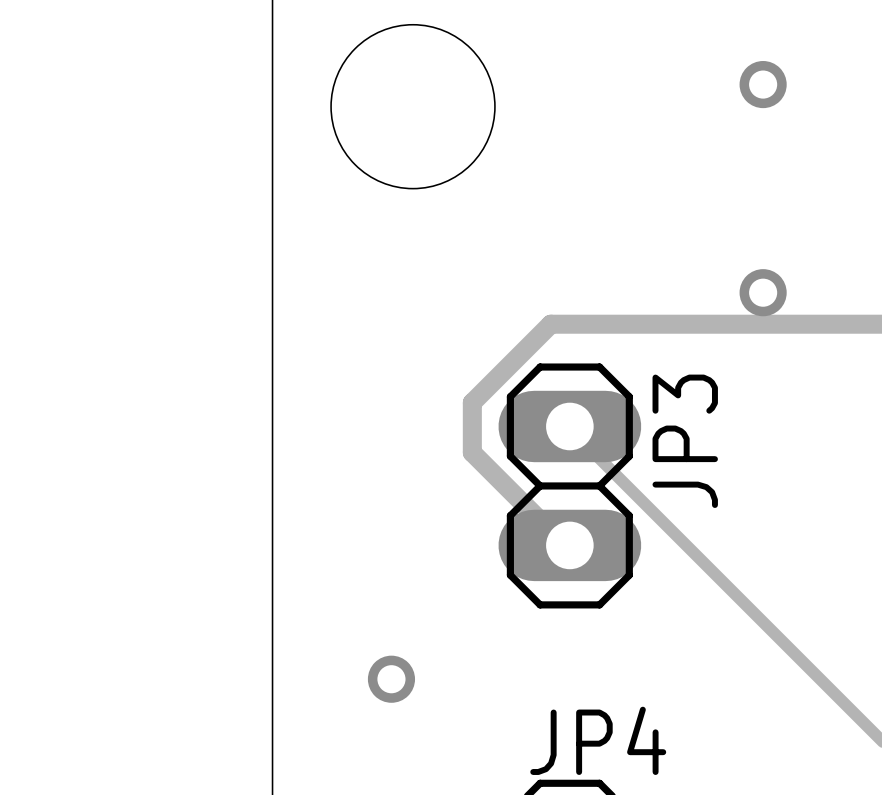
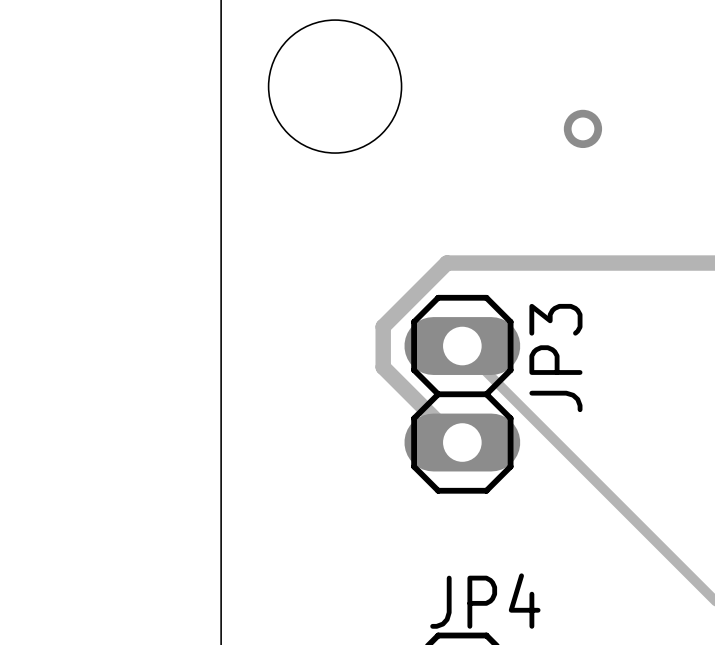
via: (763, 84) -> none
via: none -> (582, 128)
via: (763, 292) -> none
via: (391, 679) -> none

